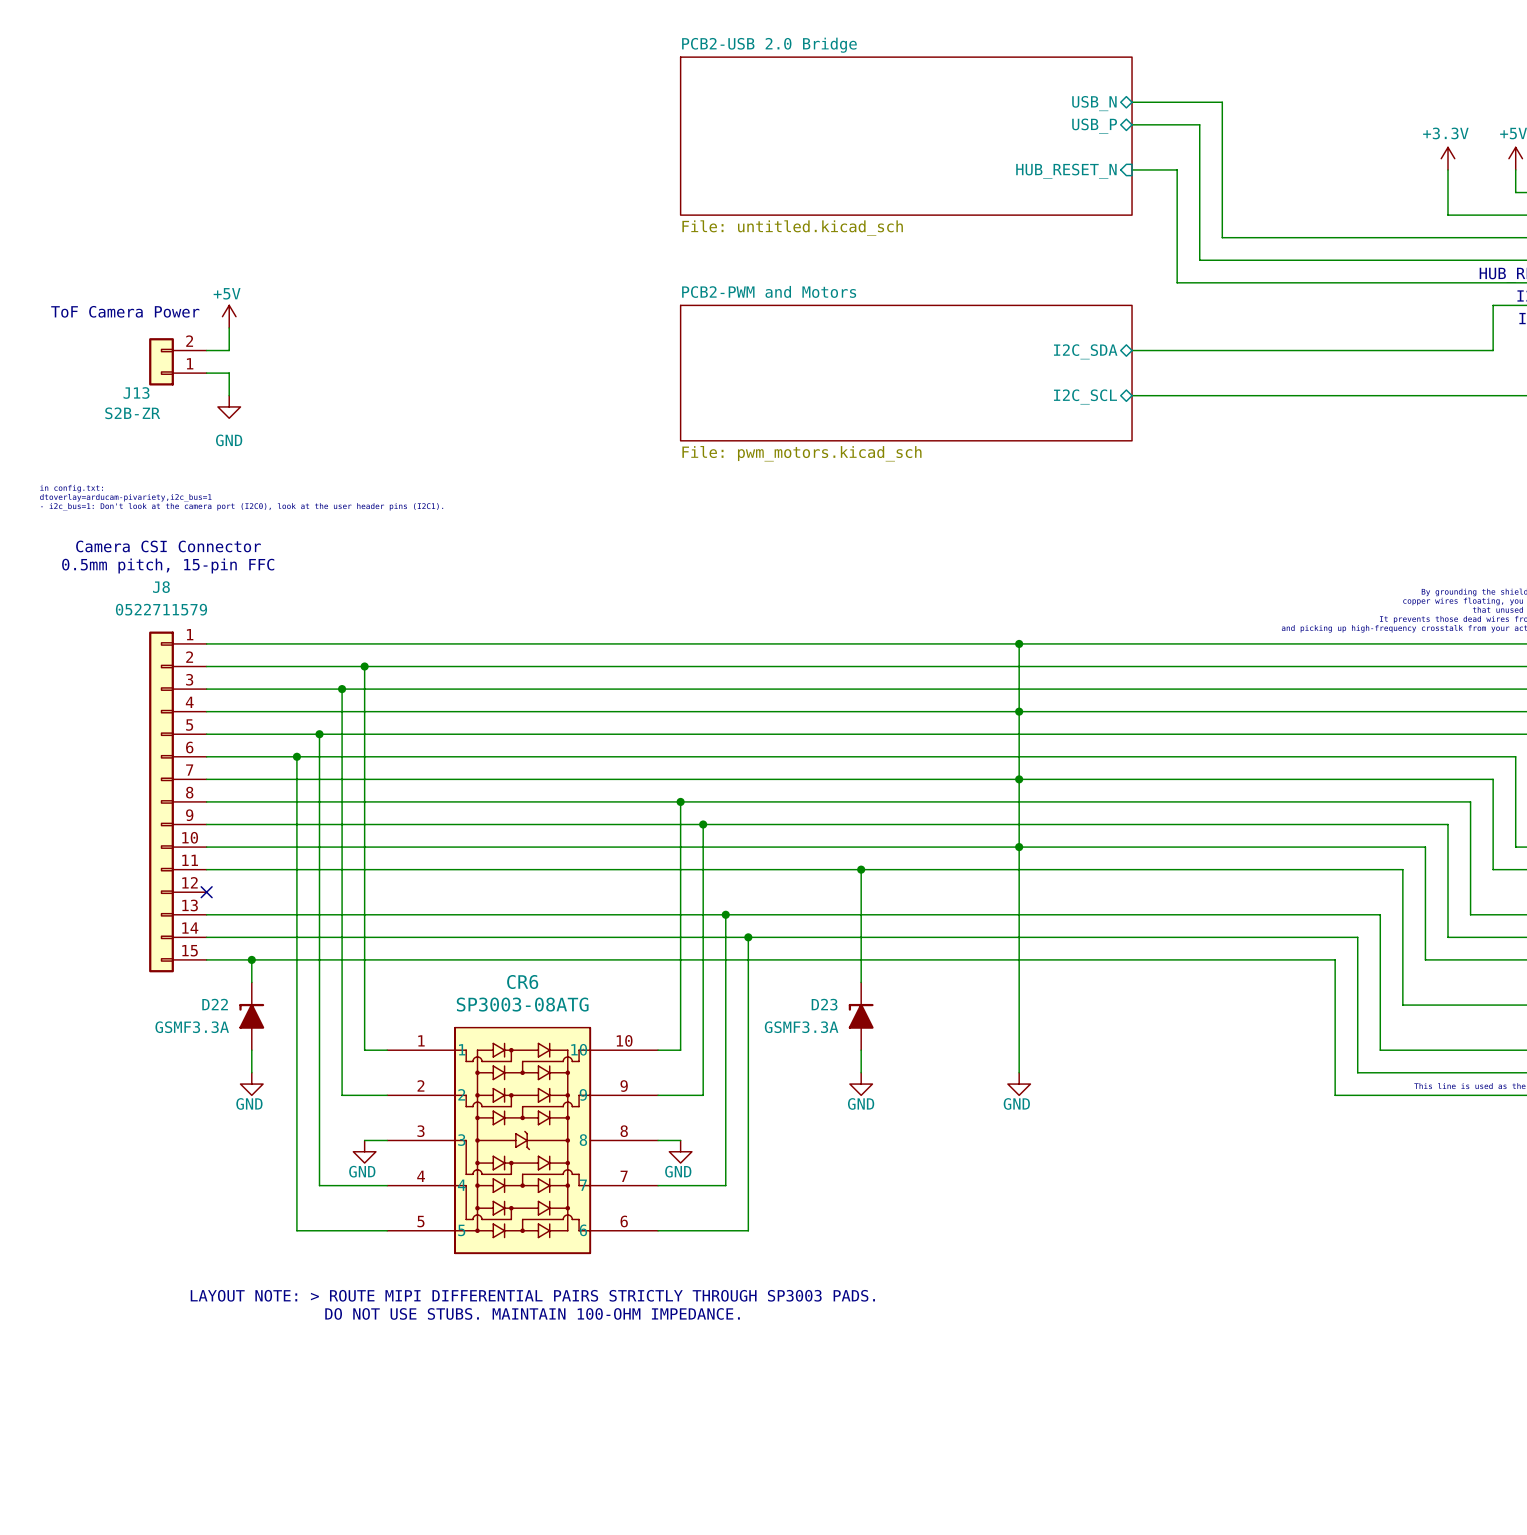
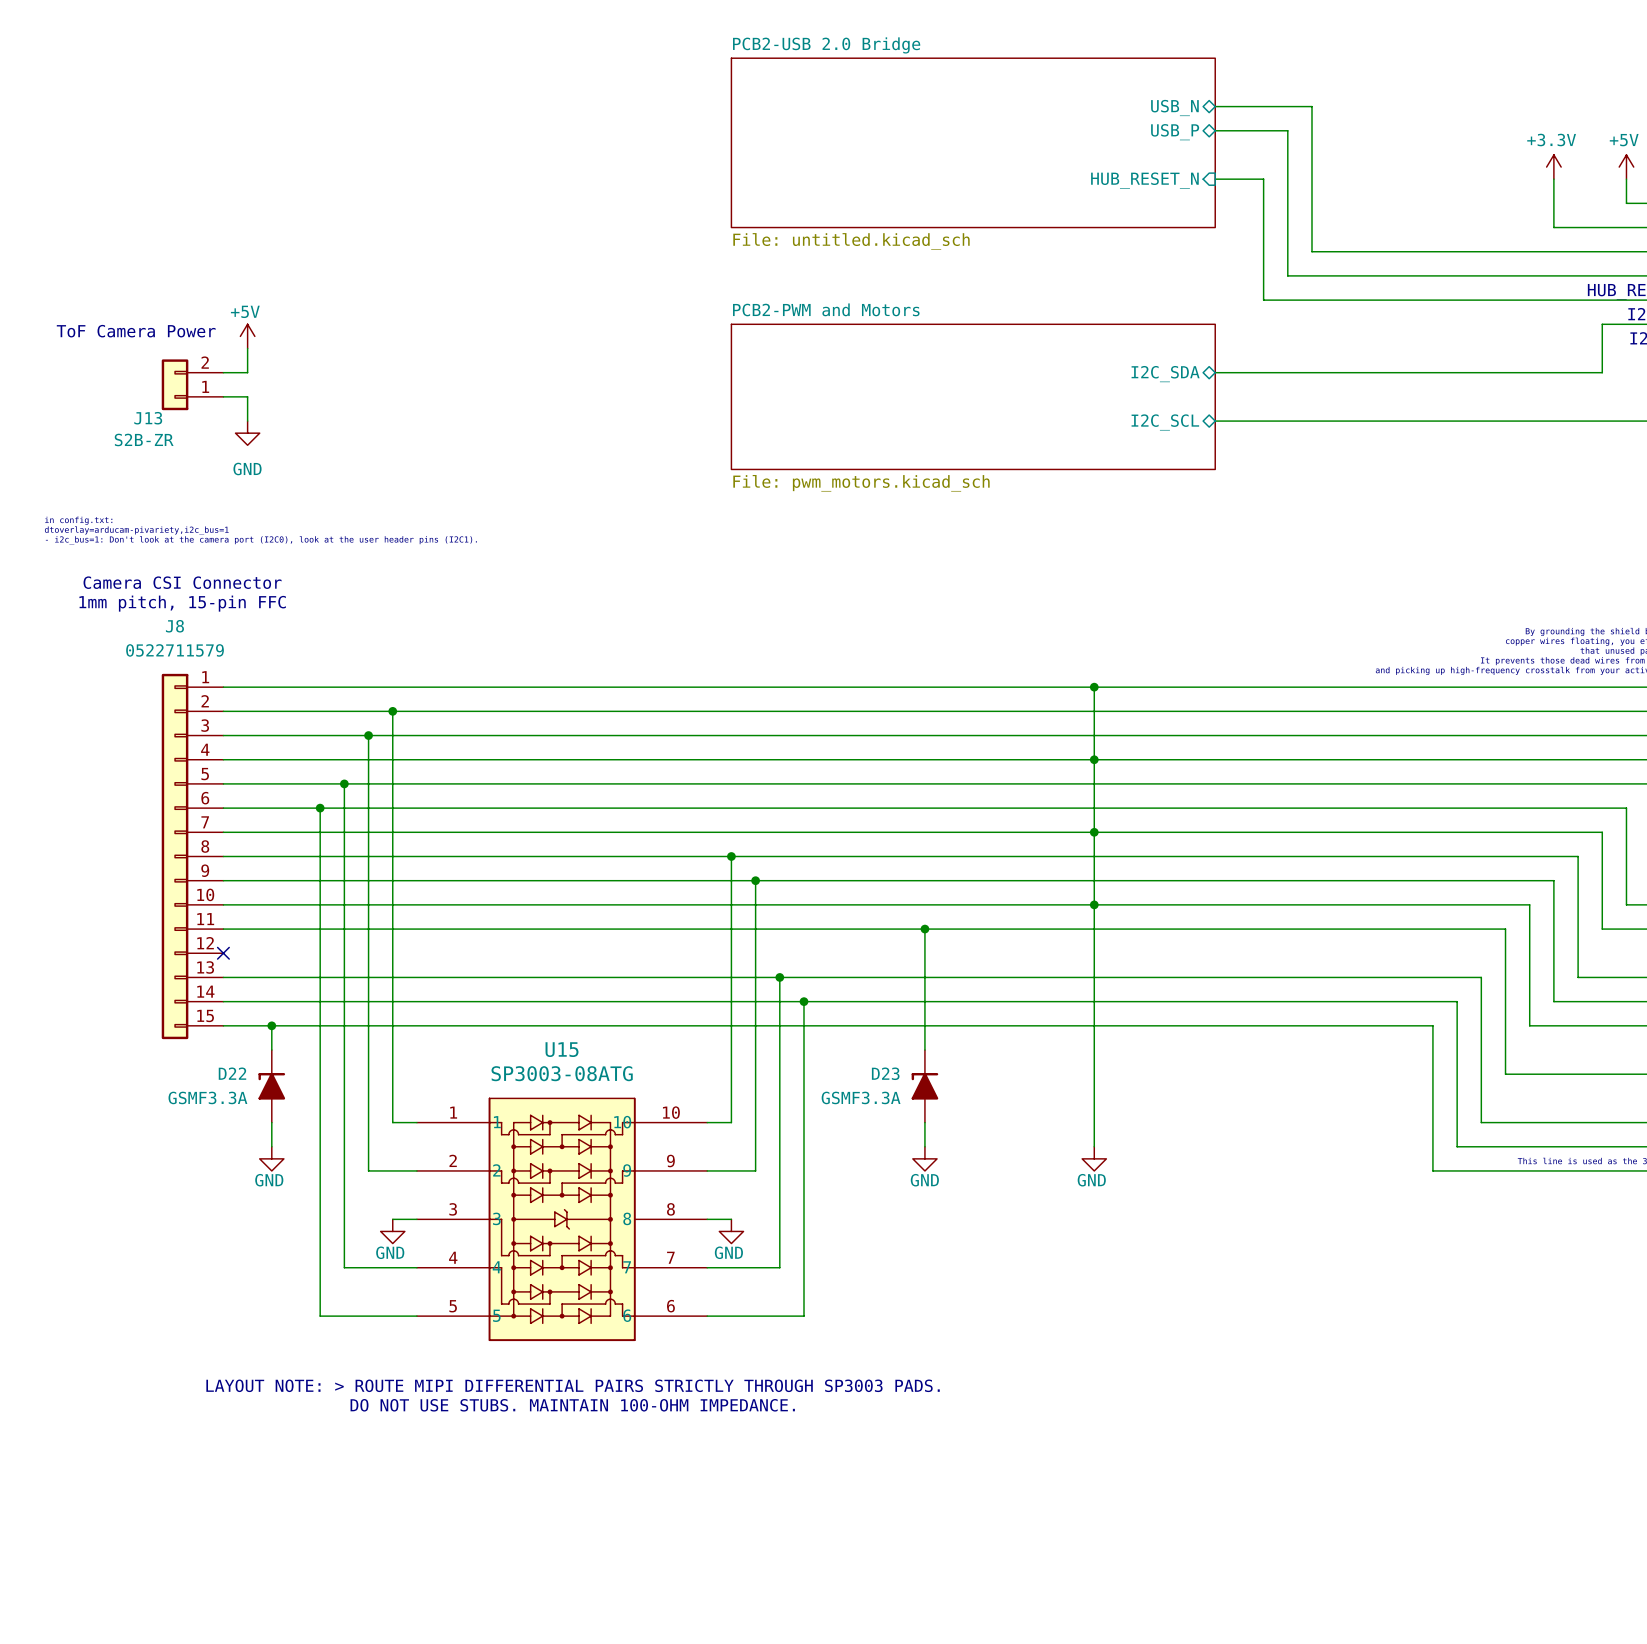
text: 0.5mm pitch, 15-pin FFC (168, 565) -> 1mm pitch, 15-pin FFC (182, 603)
CR6 name: CR6 (522, 982) -> U15 (562, 1049)

